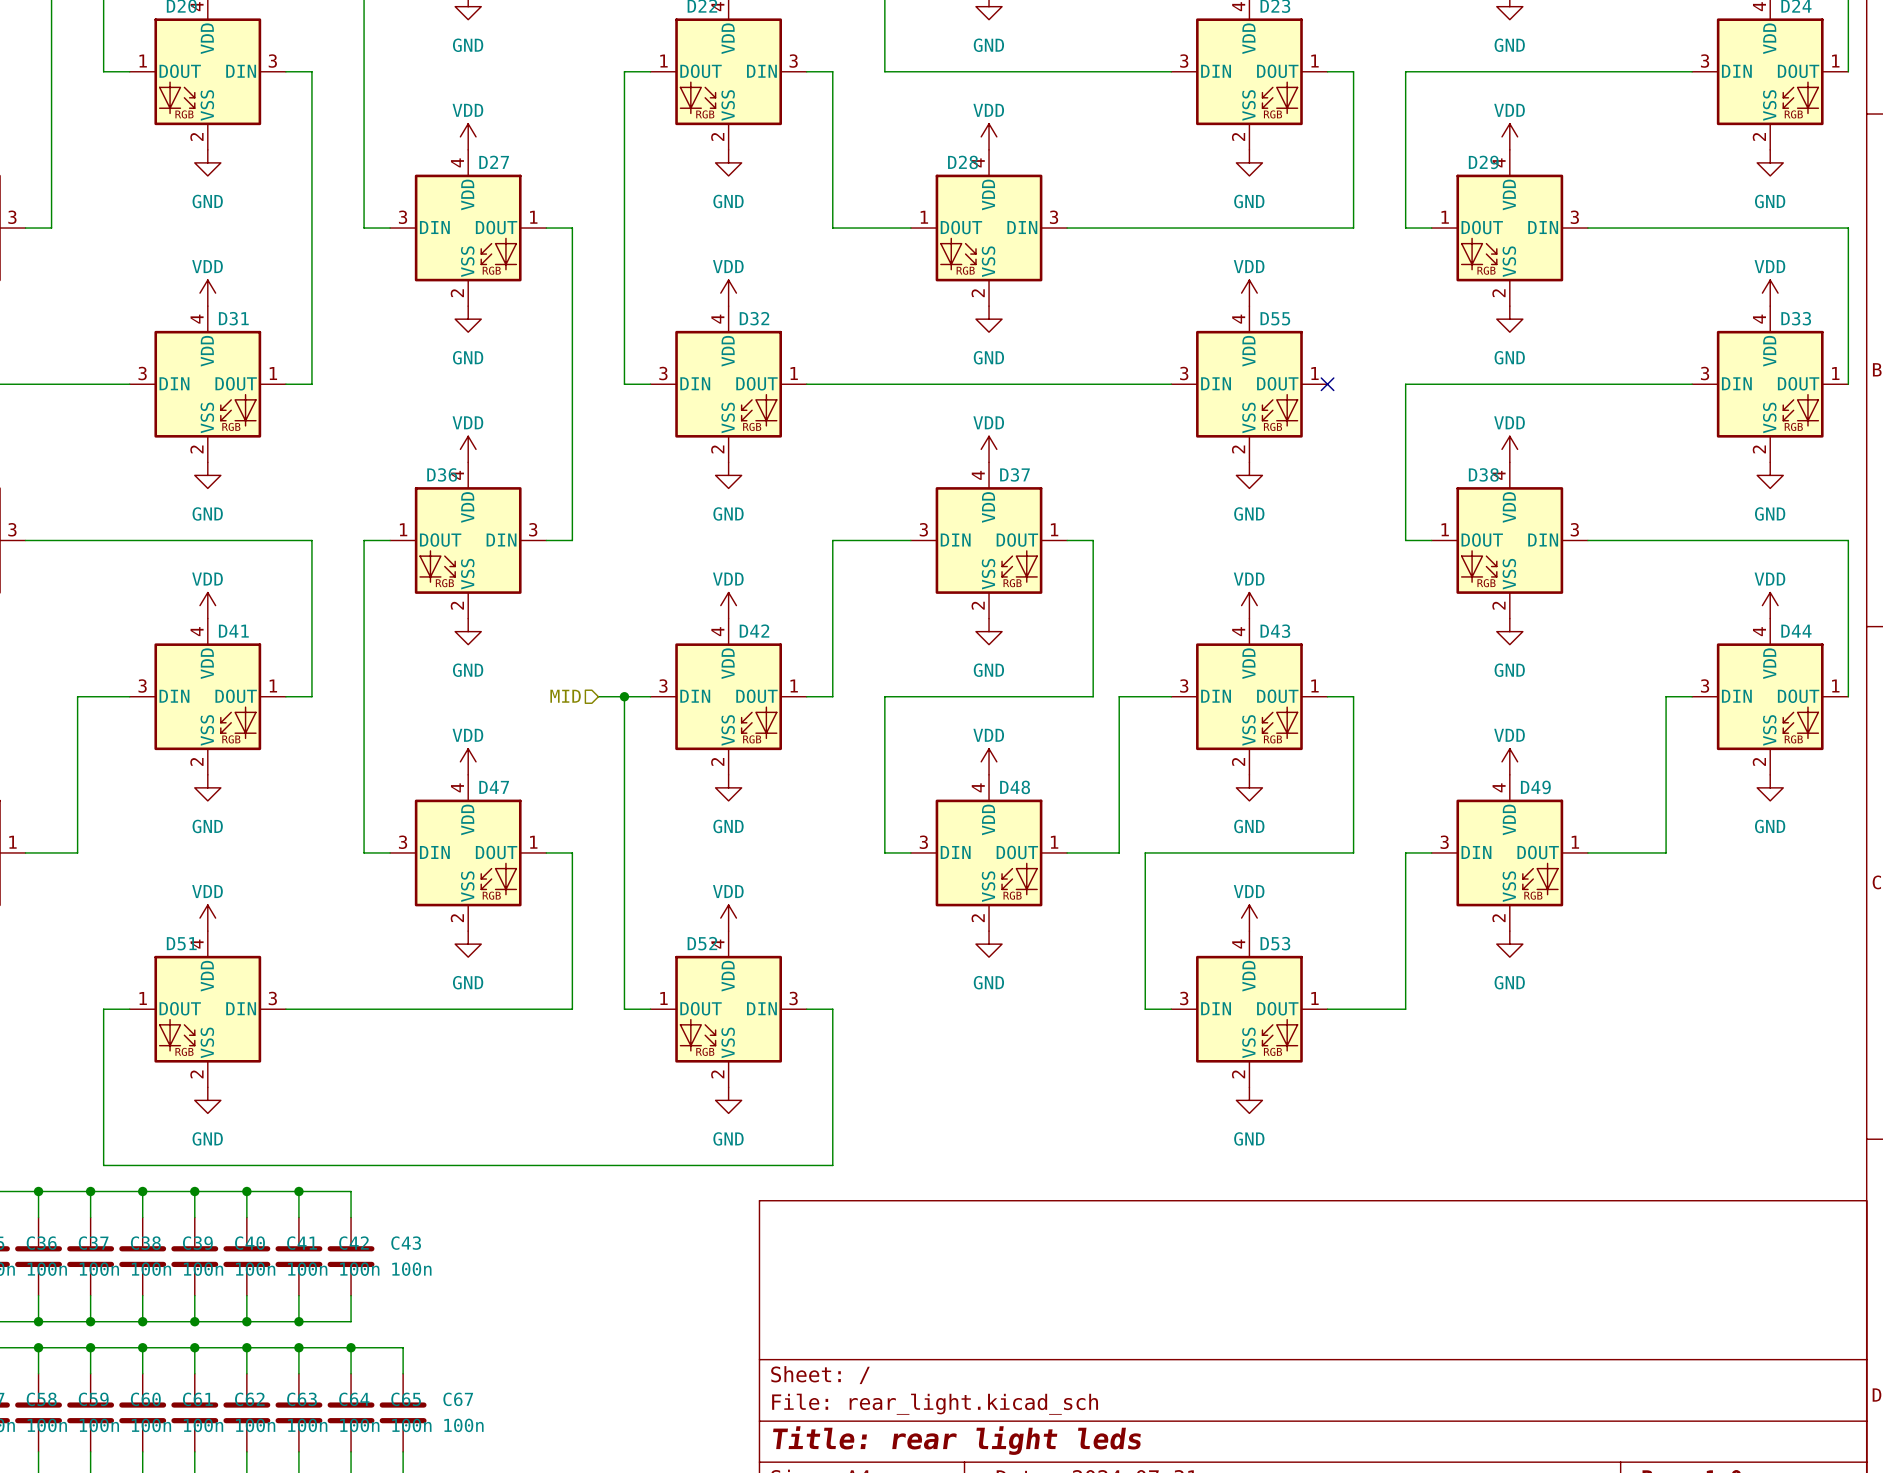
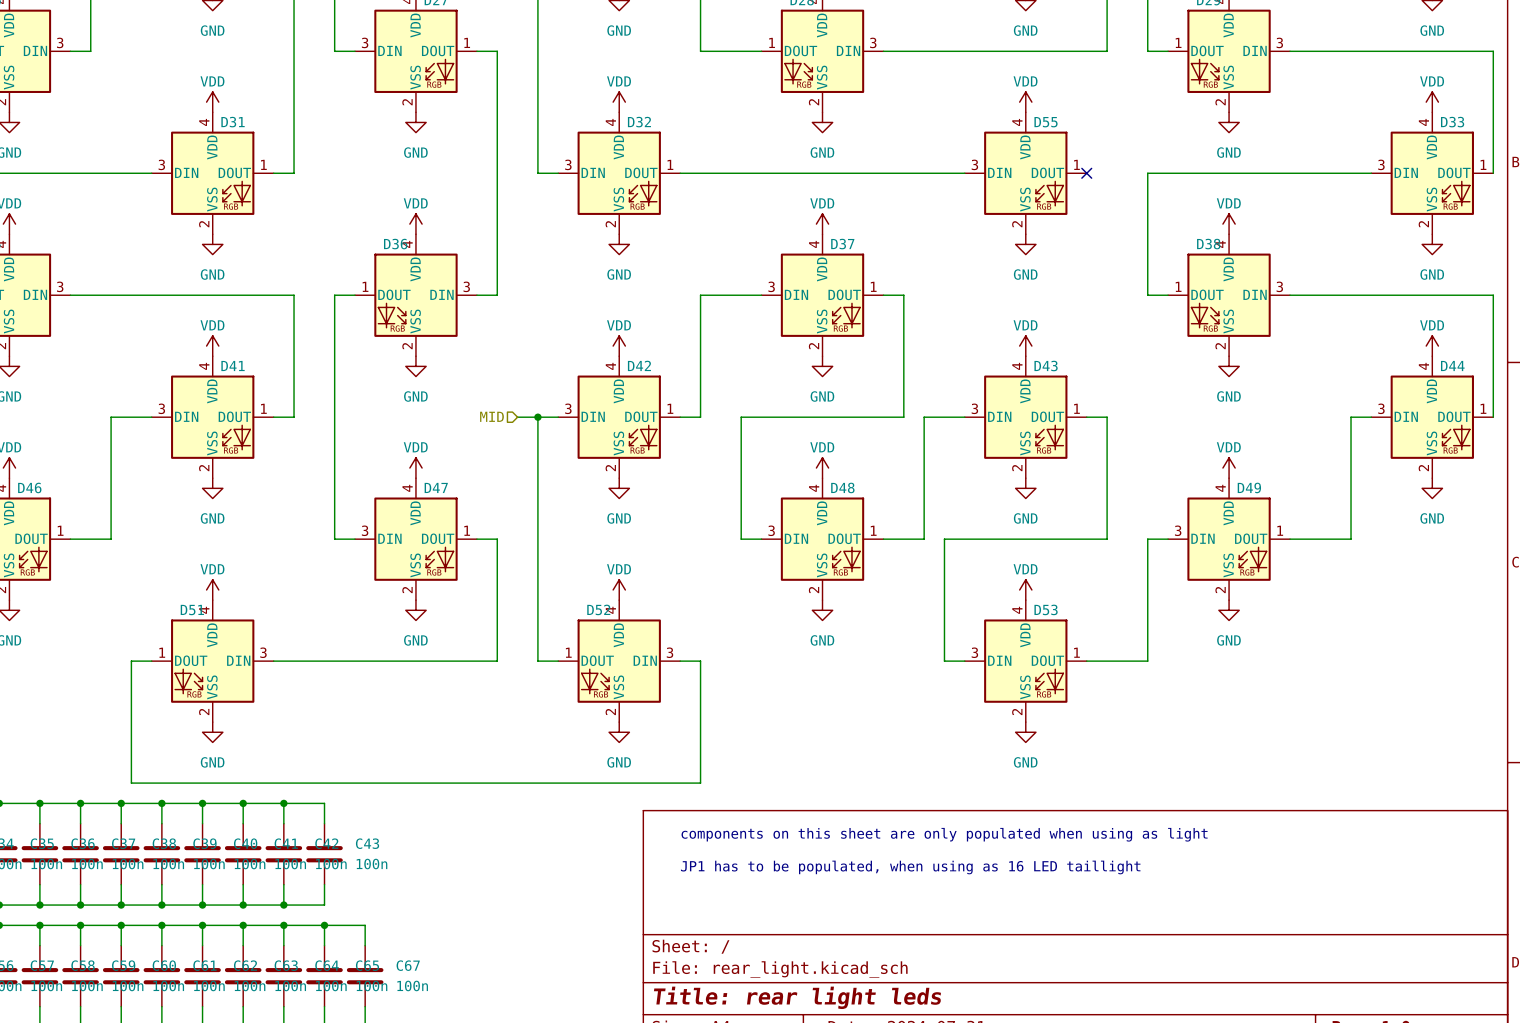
text: none -> components on this sheet are only populated when using as light (944, 834)
text: none -> JP1 has to be populated, when using as 16 LED taillight (910, 867)

